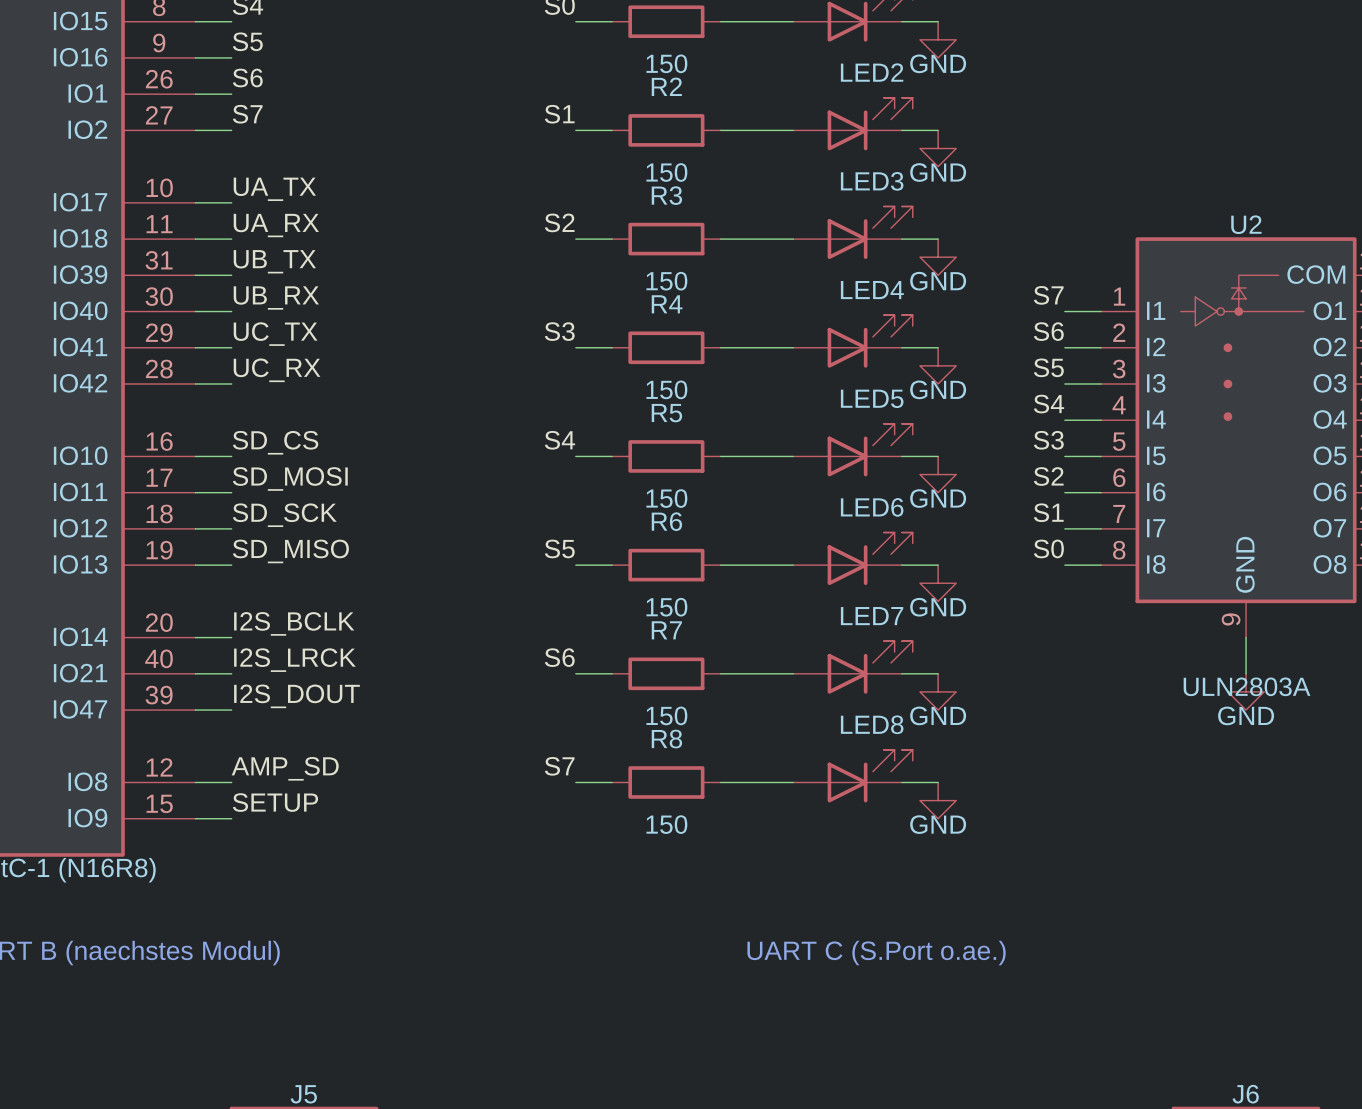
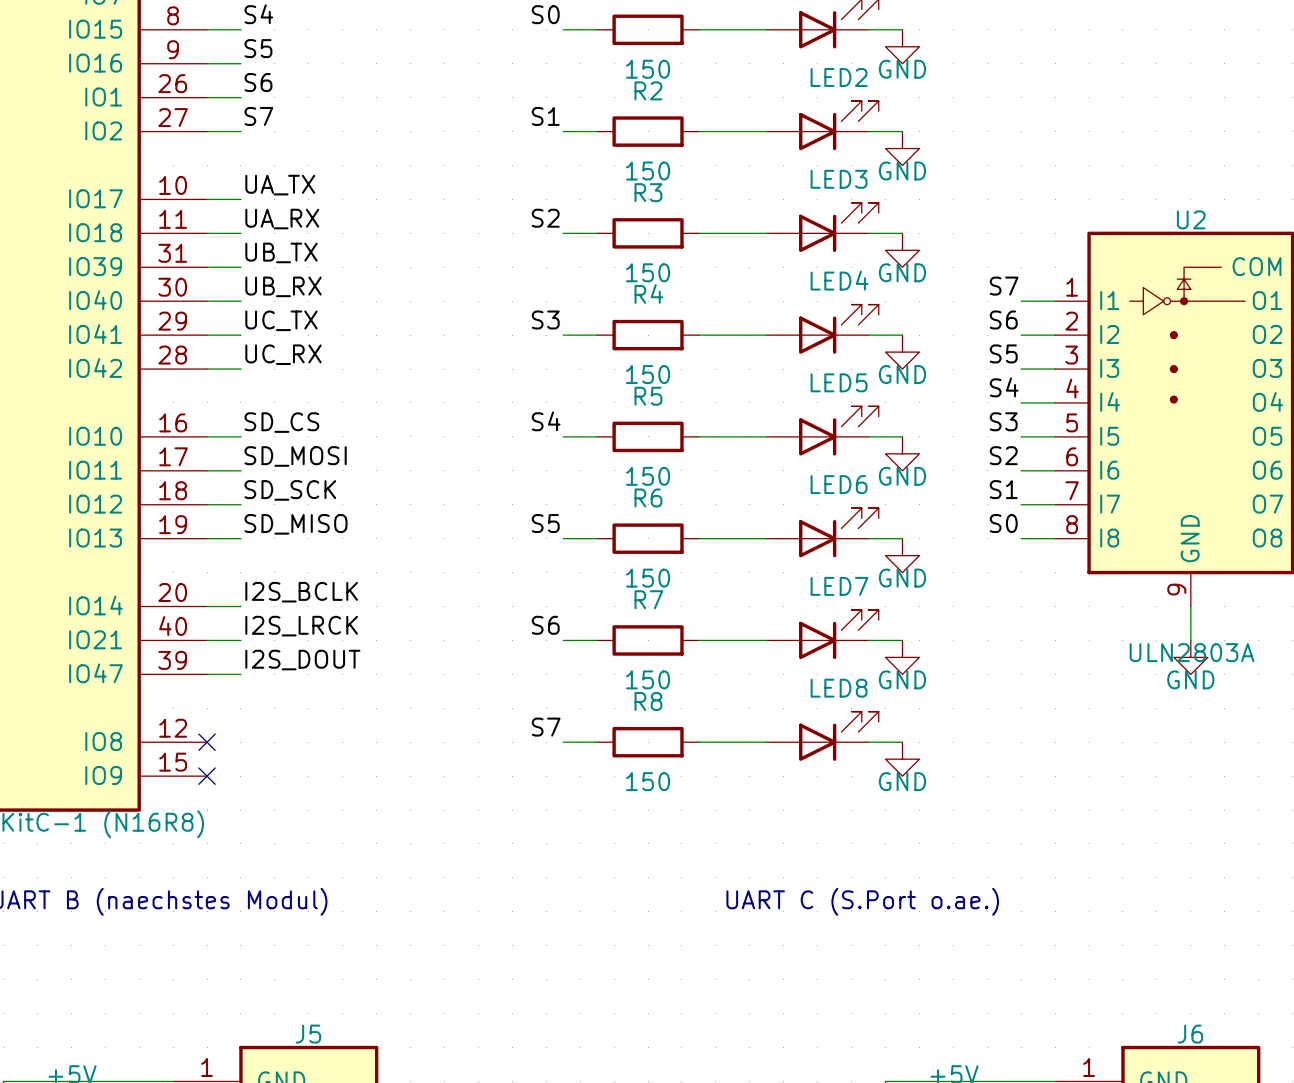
label: AMP_SD (285, 768) -> none
wire: (195, 782) (231, 782) -> none
no-connect mark: none -> (207, 742)
label: SETUP (275, 802) -> none
wire: (195, 818) (231, 818) -> none
no-connect mark: none -> (207, 776)

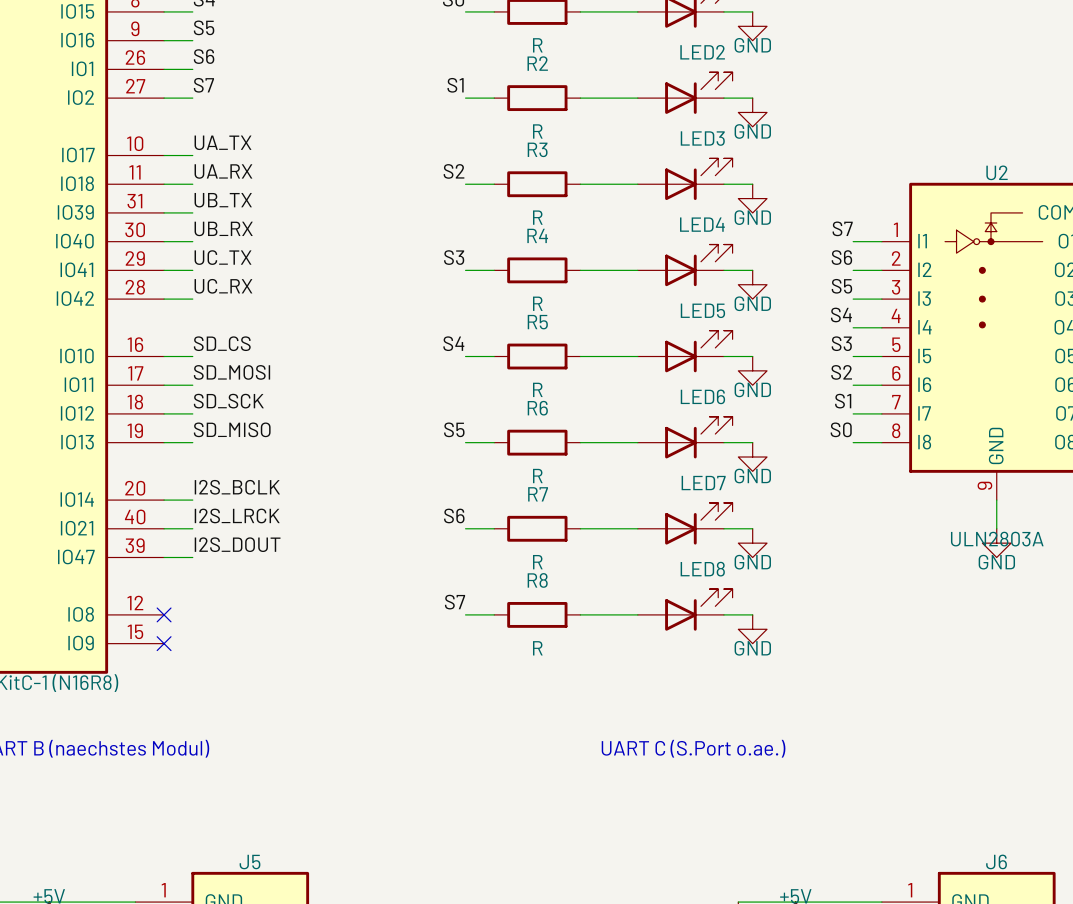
part value: 150 (648, 69) -> R (537, 45)
R2 value: 150 (648, 171) -> R (537, 131)
R3 value: 150 (648, 272) -> R (537, 217)
R4 value: 150 (648, 374) -> R (537, 303)
R5 value: 150 (648, 476) -> R (537, 389)
R6 value: 150 (648, 578) -> R (537, 476)
R7 value: 150 (648, 679) -> R (537, 562)
R8 value: 150 (648, 781) -> R (537, 648)

